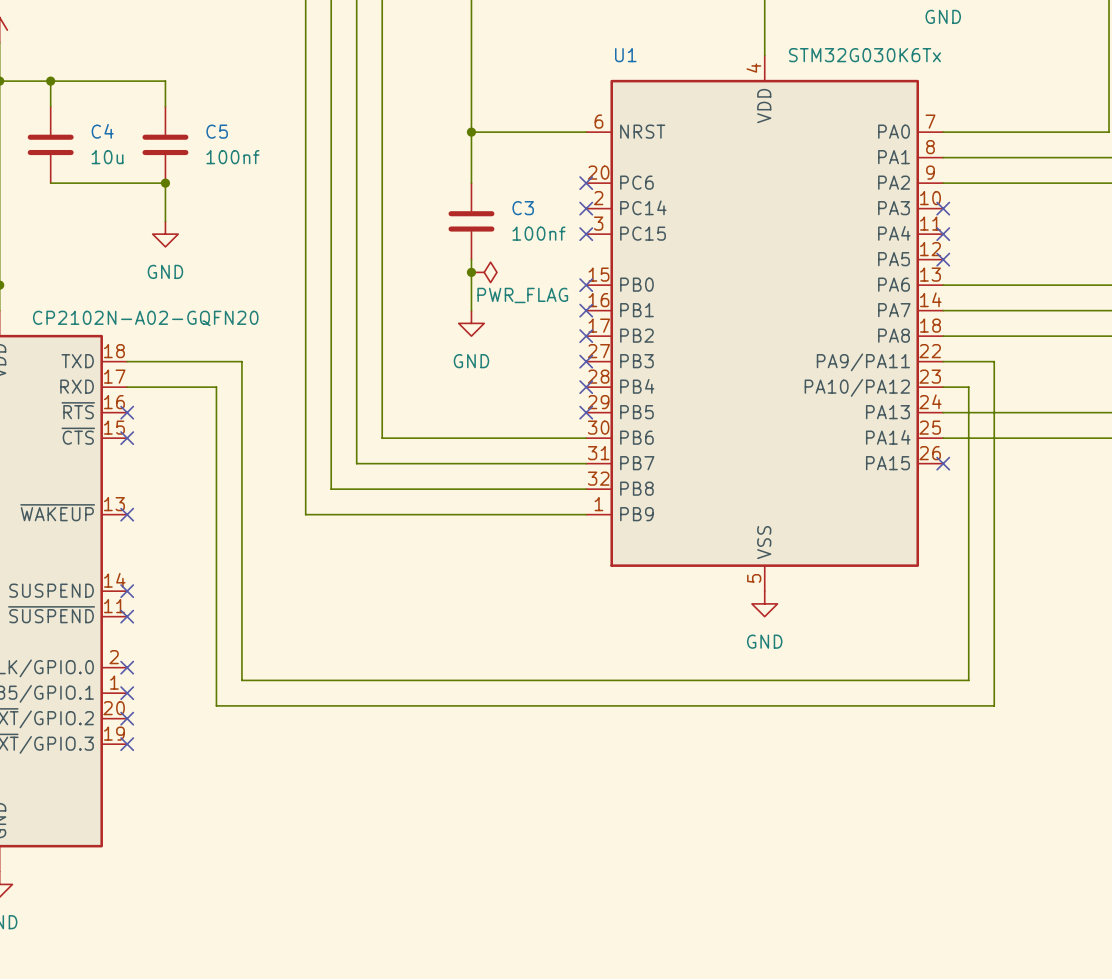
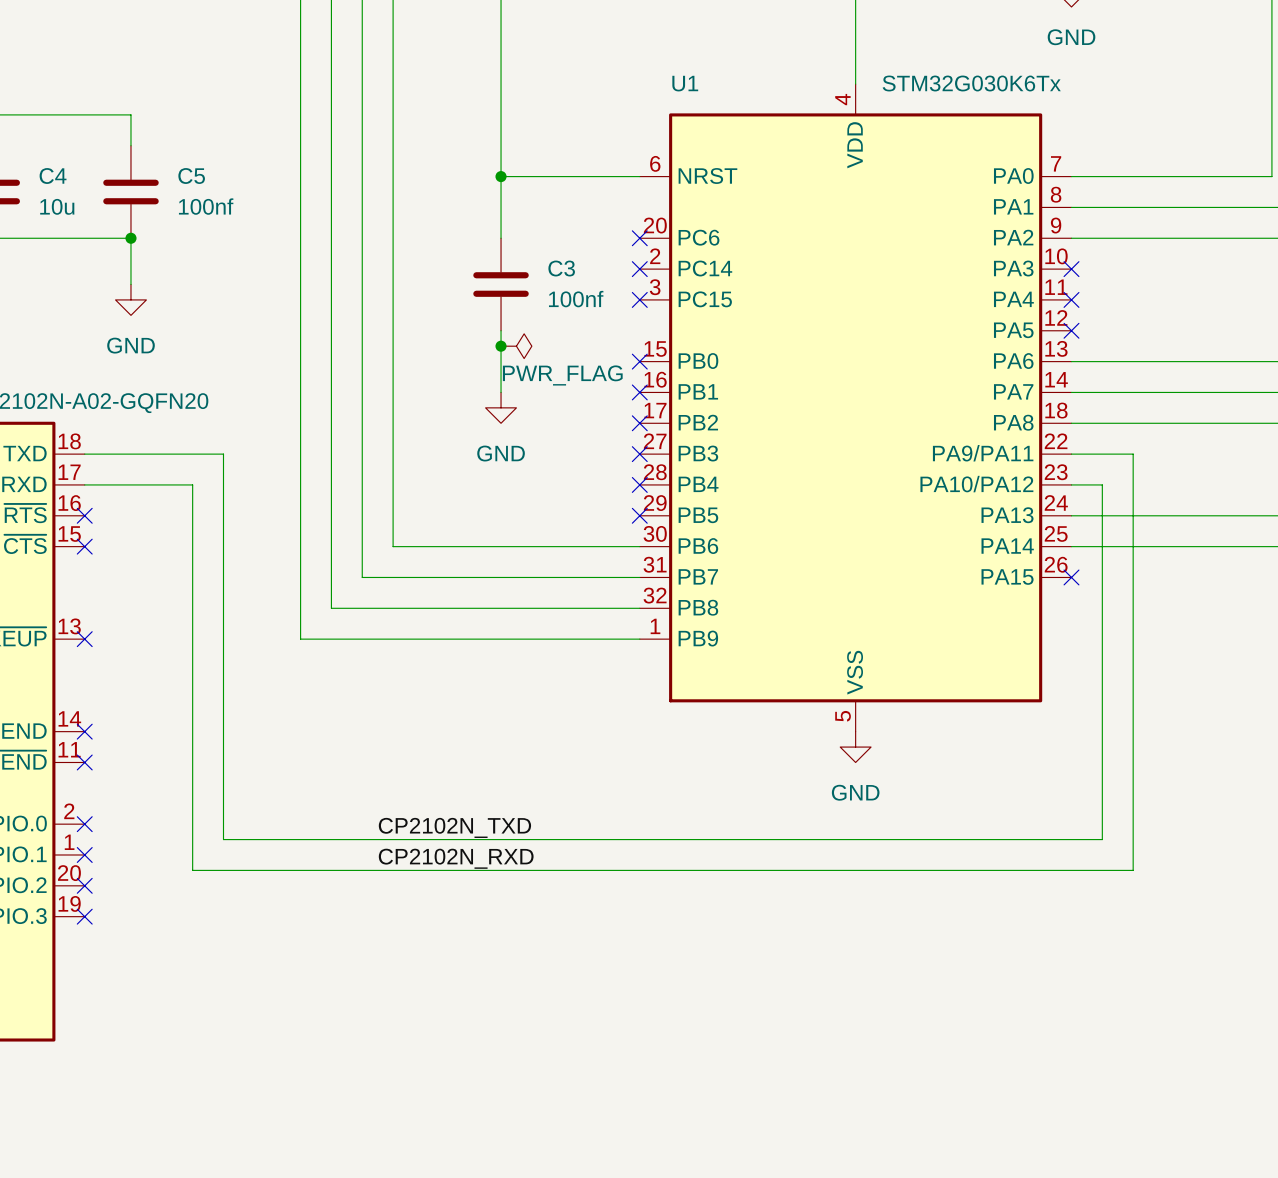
label: none -> CP2102N_TXD (454, 827)
label: none -> CP2102N_RXD (456, 858)

